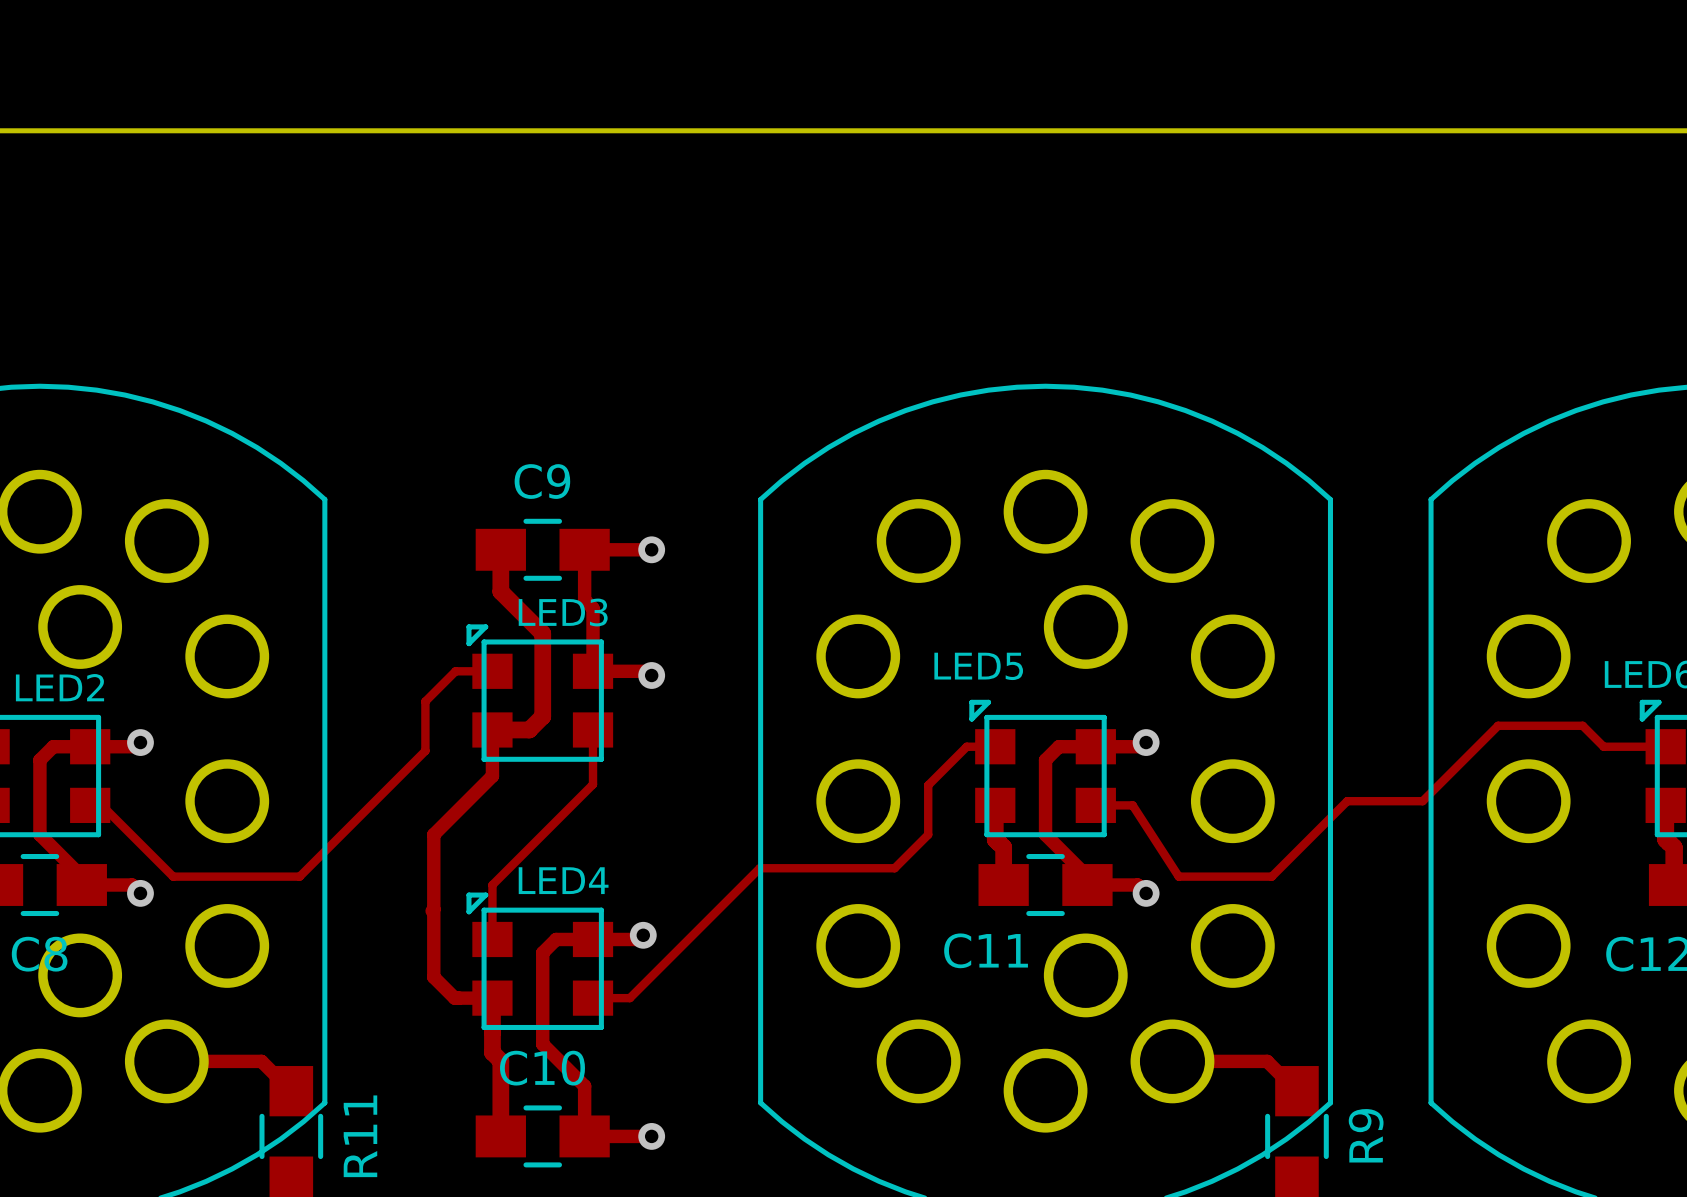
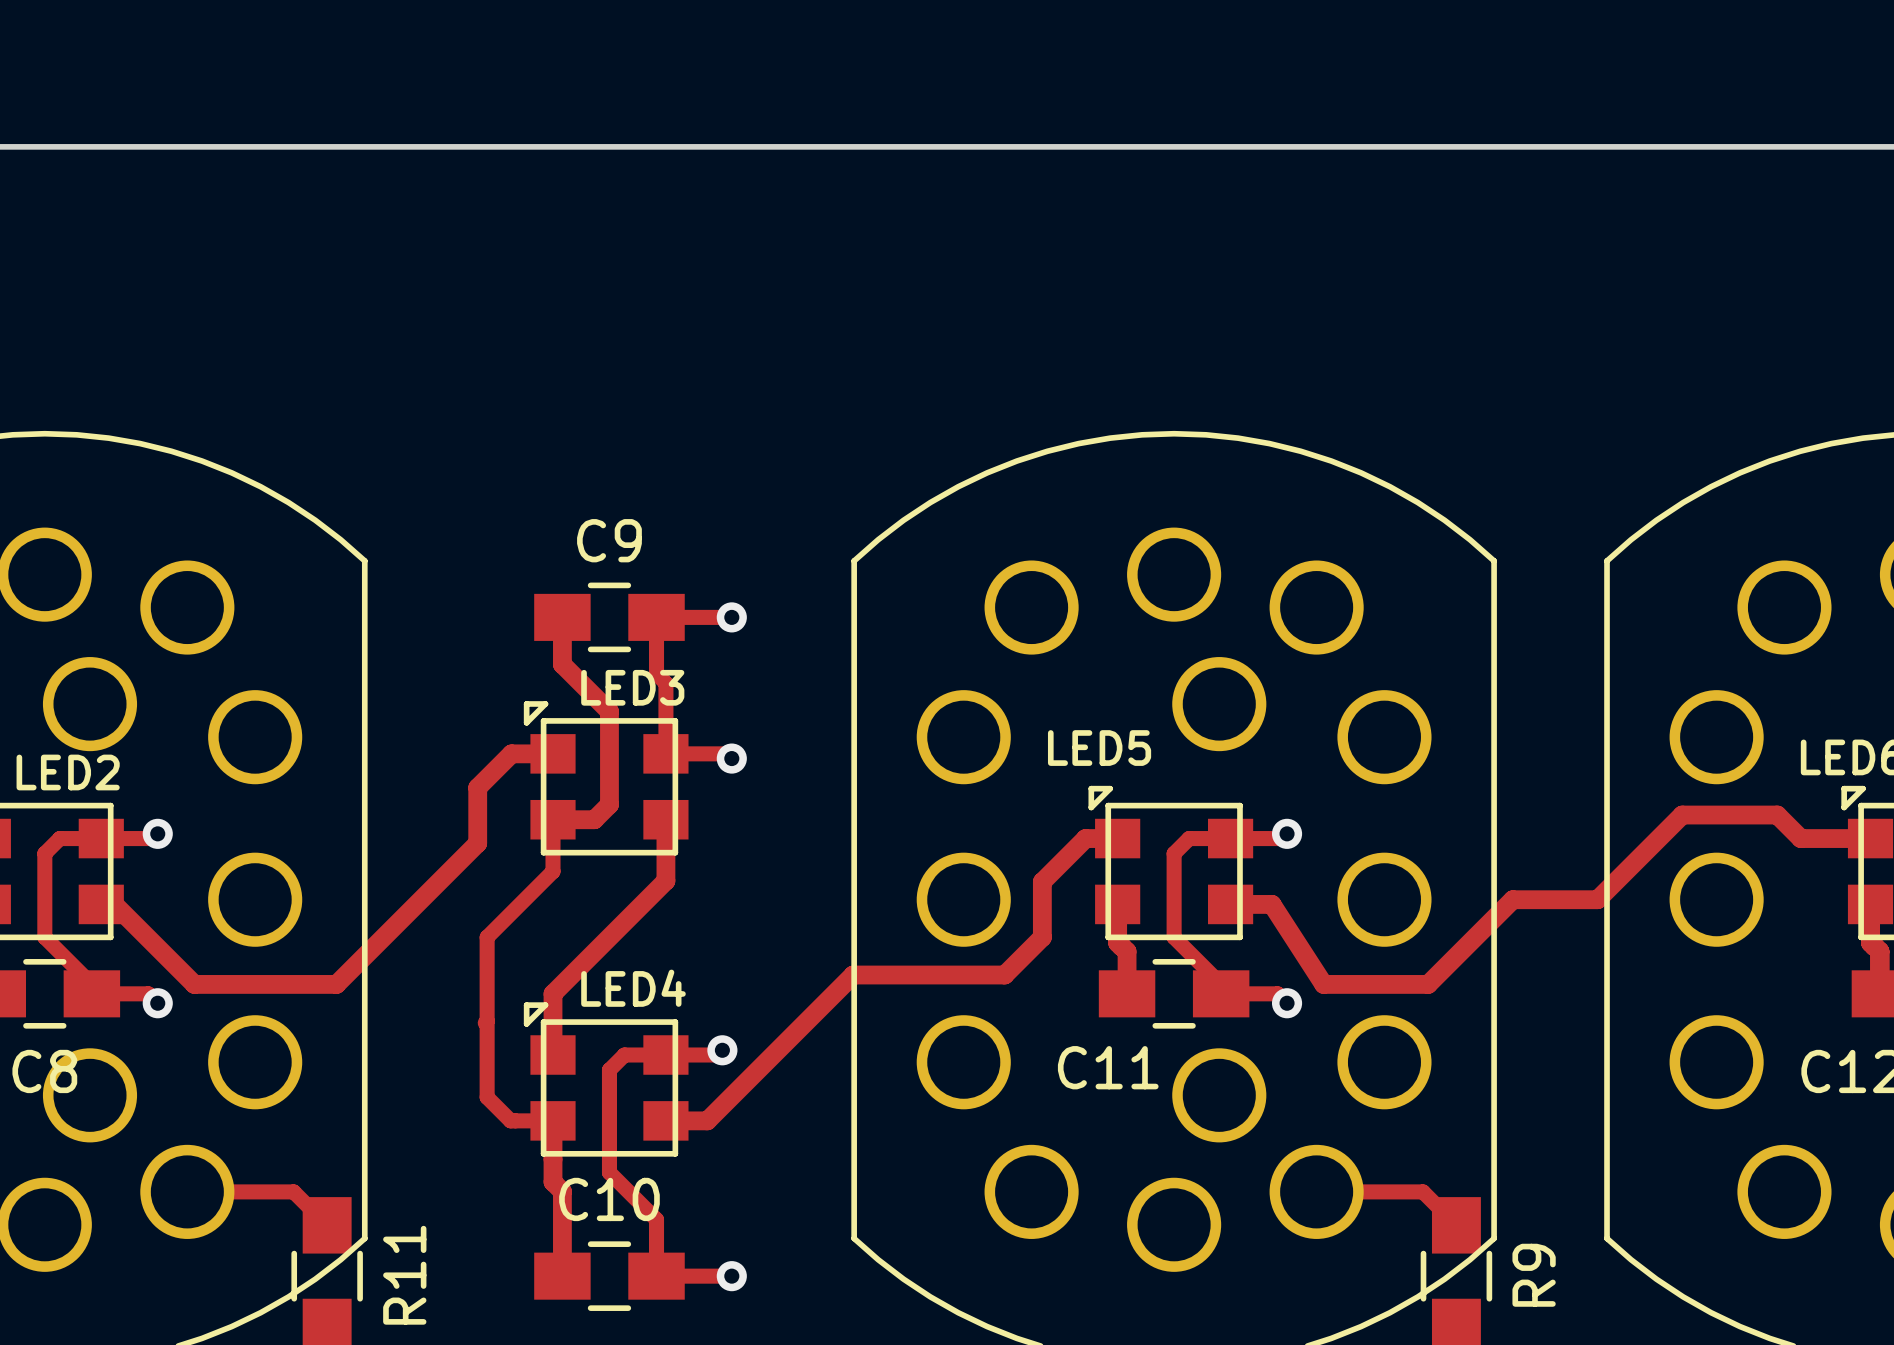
track width: thin (492, 671) (455, 671) (425, 701) (425, 750) (299, 876) (173, 876) (101, 805) (90, 805) -> thick (553, 753) (511, 753) (477, 787) (477, 843) (336, 984) (194, 984) (114, 904) (101, 904)
track width: thin (593, 729) (593, 784) (492, 885) (492, 939) -> thick (665, 819) (665, 880) (553, 993) (553, 1055)
track width: thin (995, 746) (966, 746) (928, 785) (928, 834) (894, 868) (759, 868) (629, 998) (593, 998) -> thick (1117, 838) (1085, 838) (1042, 881) (1042, 937) (1004, 975) (853, 975) (707, 1120) (665, 1120)
track width: thin (1665, 746) (1603, 746) (1582, 725) (1498, 725) (1422, 801) (1347, 801) (1271, 876) (1178, 876) (1132, 805) (1095, 805) -> thick (1870, 838) (1800, 838) (1777, 815) (1682, 815) (1597, 899) (1512, 899) (1428, 984) (1323, 984) (1271, 904) (1230, 904)

